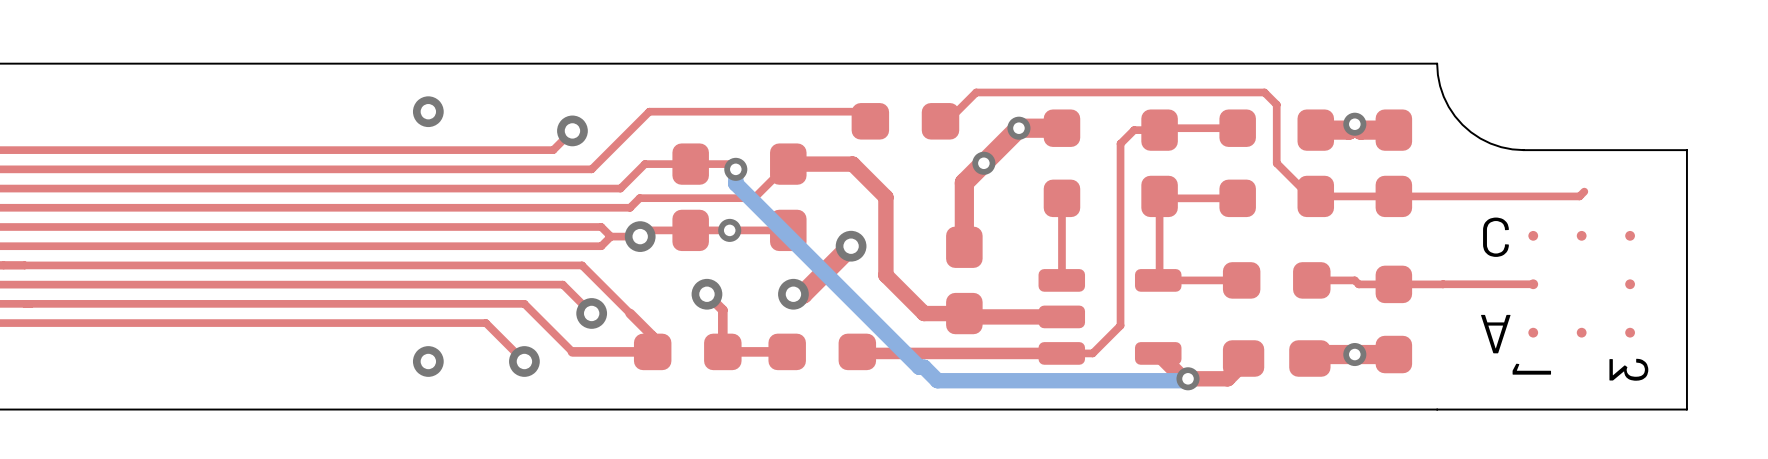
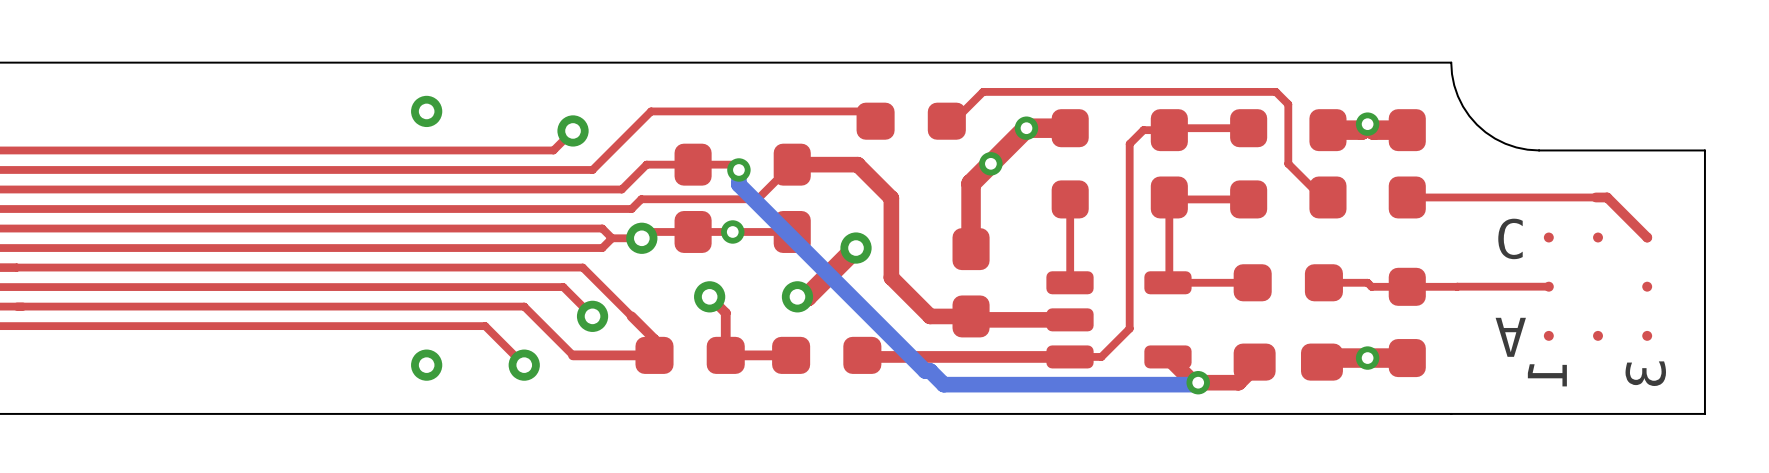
top track: (1584, 191) (1579, 196) -> (1647, 237) (1607, 197) (1595, 197)
top track: (1393, 196) (1315, 196) -> none

